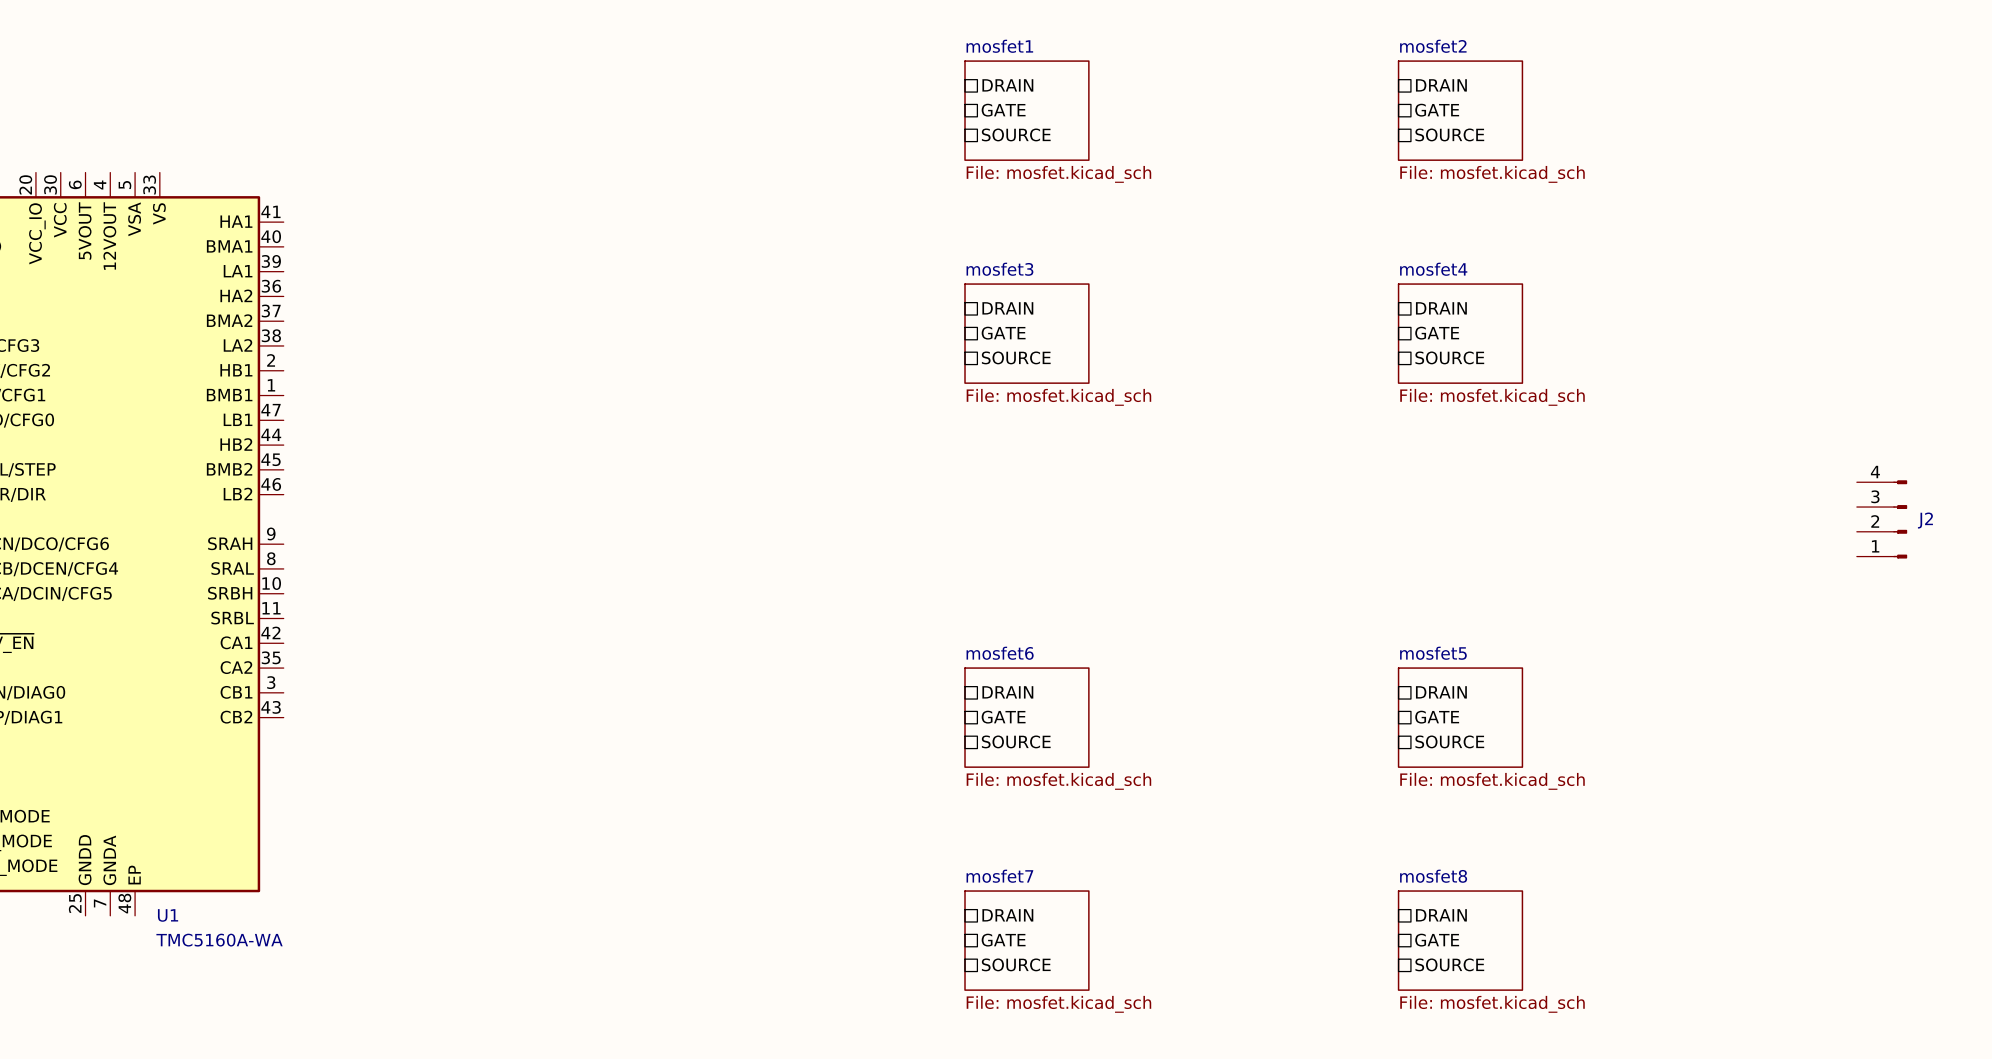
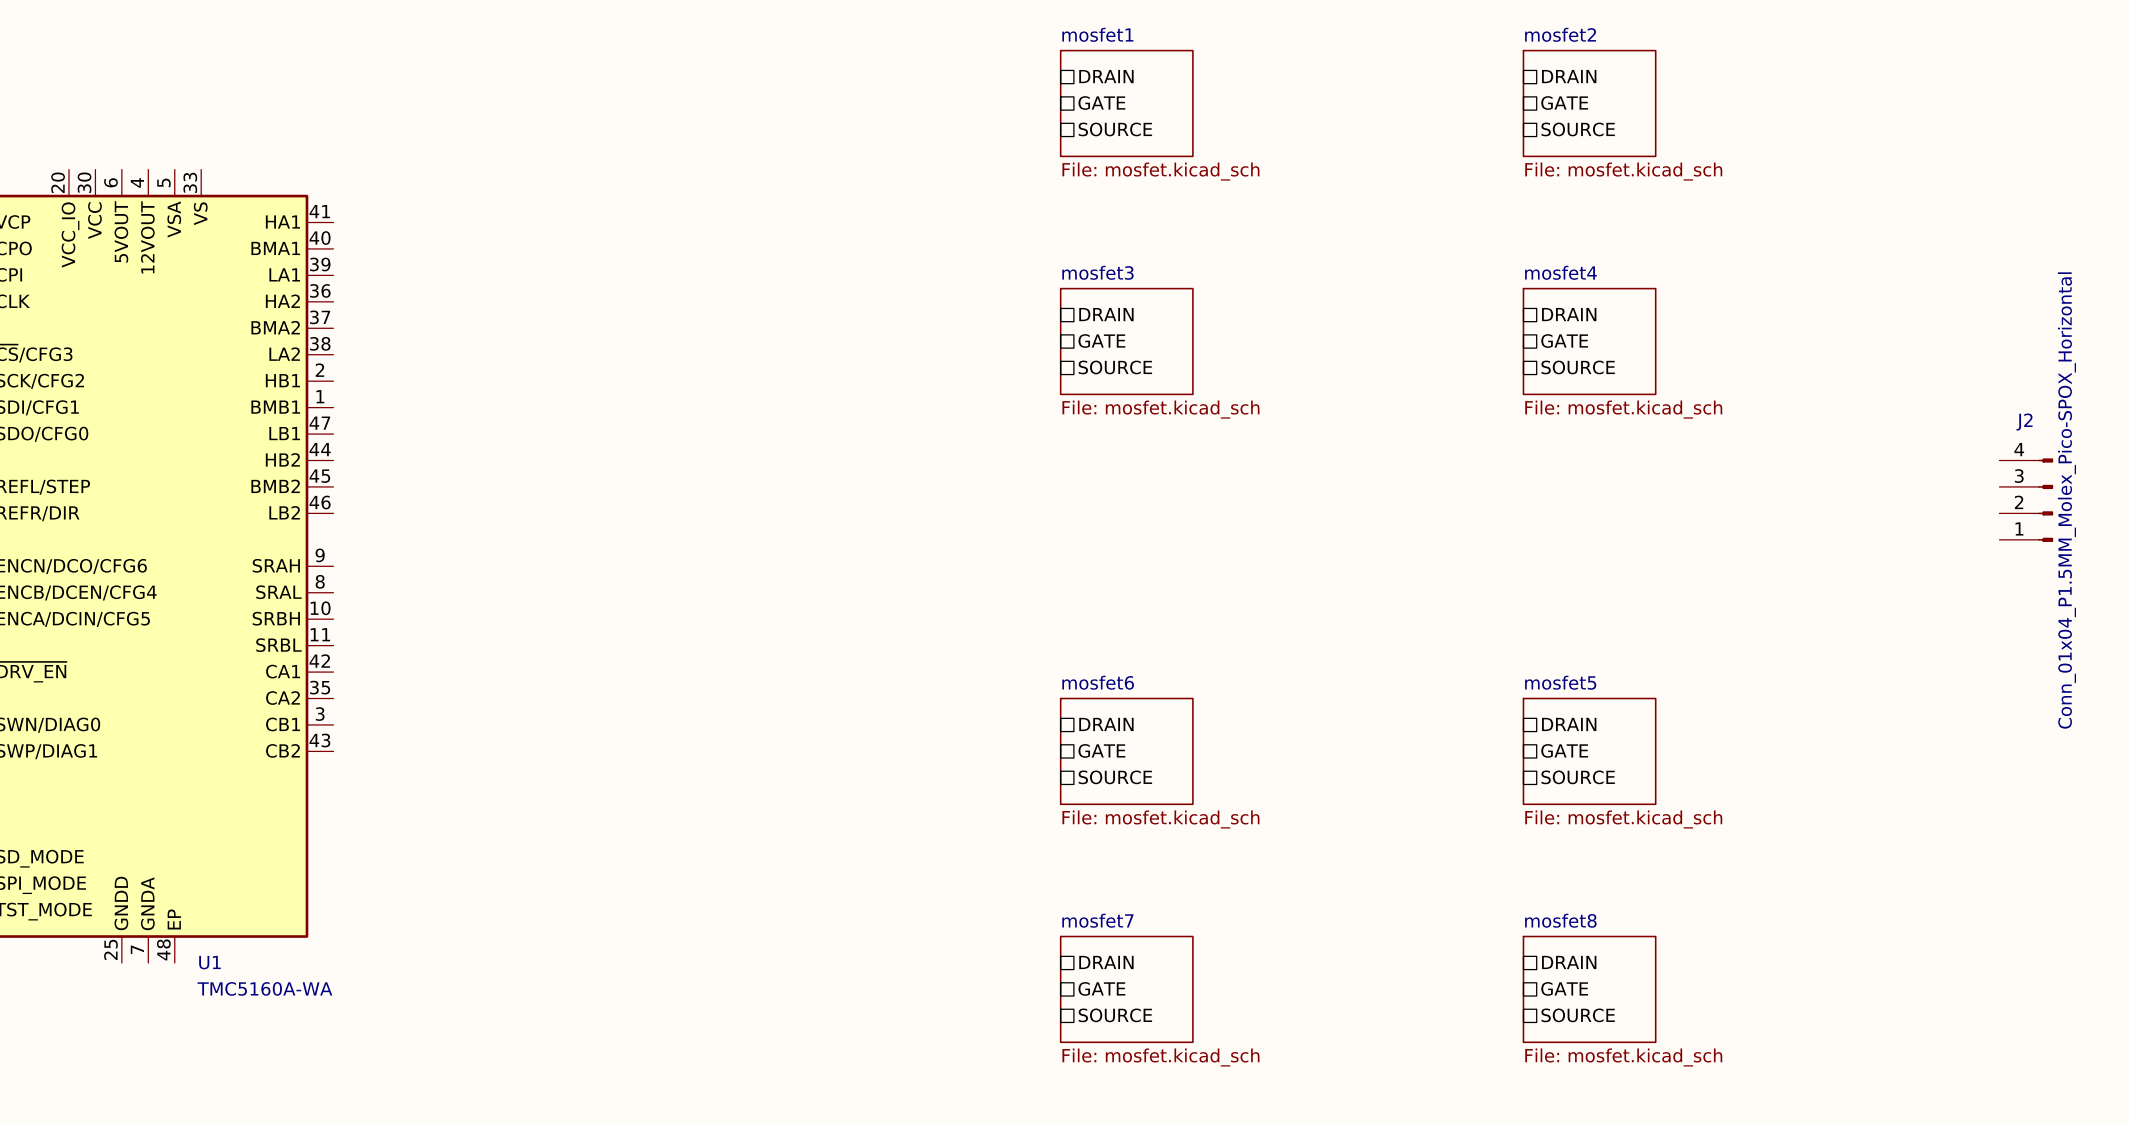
J2 value: none -> Conn_01x04_P1.5MM_Molex_Pico-SPOX_Horizontal (2066, 500)
J2 position: (1882, 519) -> (2026, 500)
J2 name position: J2 (1925, 520) -> J2 (2024, 422)

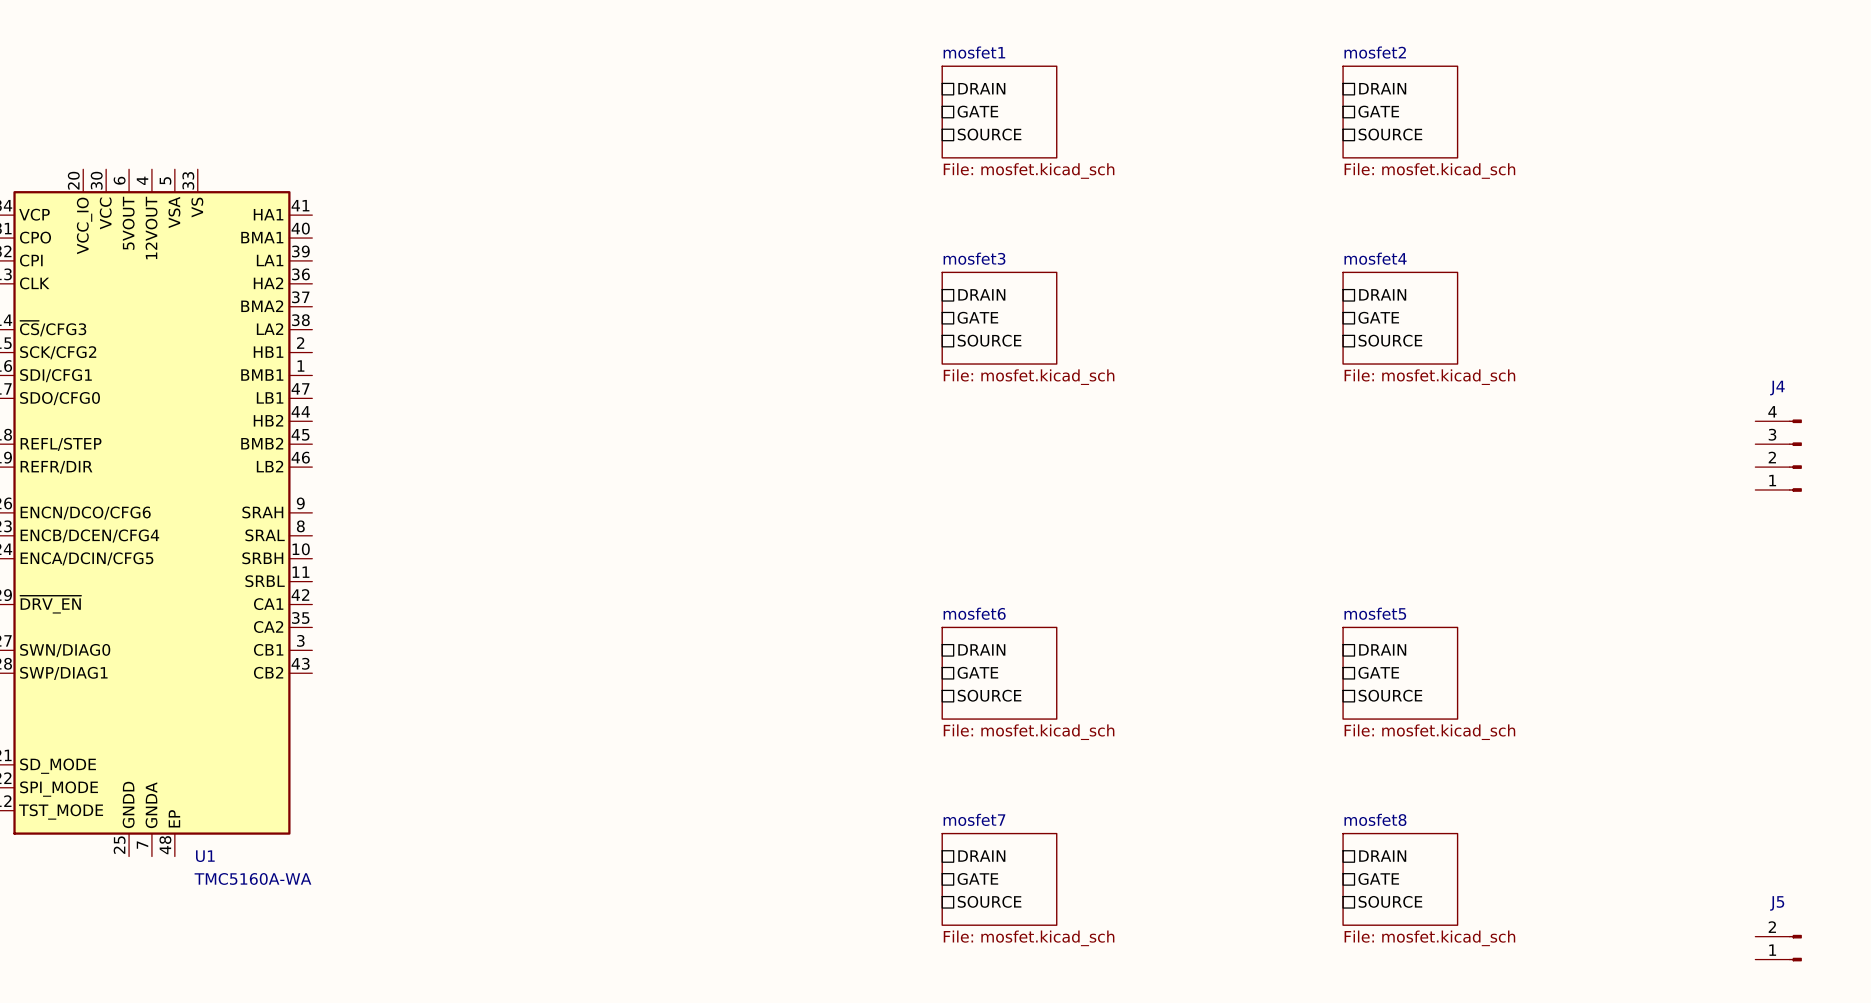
J2 name: J2 (2024, 422) -> J4 (1777, 388)
J2 value: Conn_01x04_P1.5MM_Molex_Pico-SPOX_Horizontal (2066, 500) -> none
J5: none -> (1778, 948)

